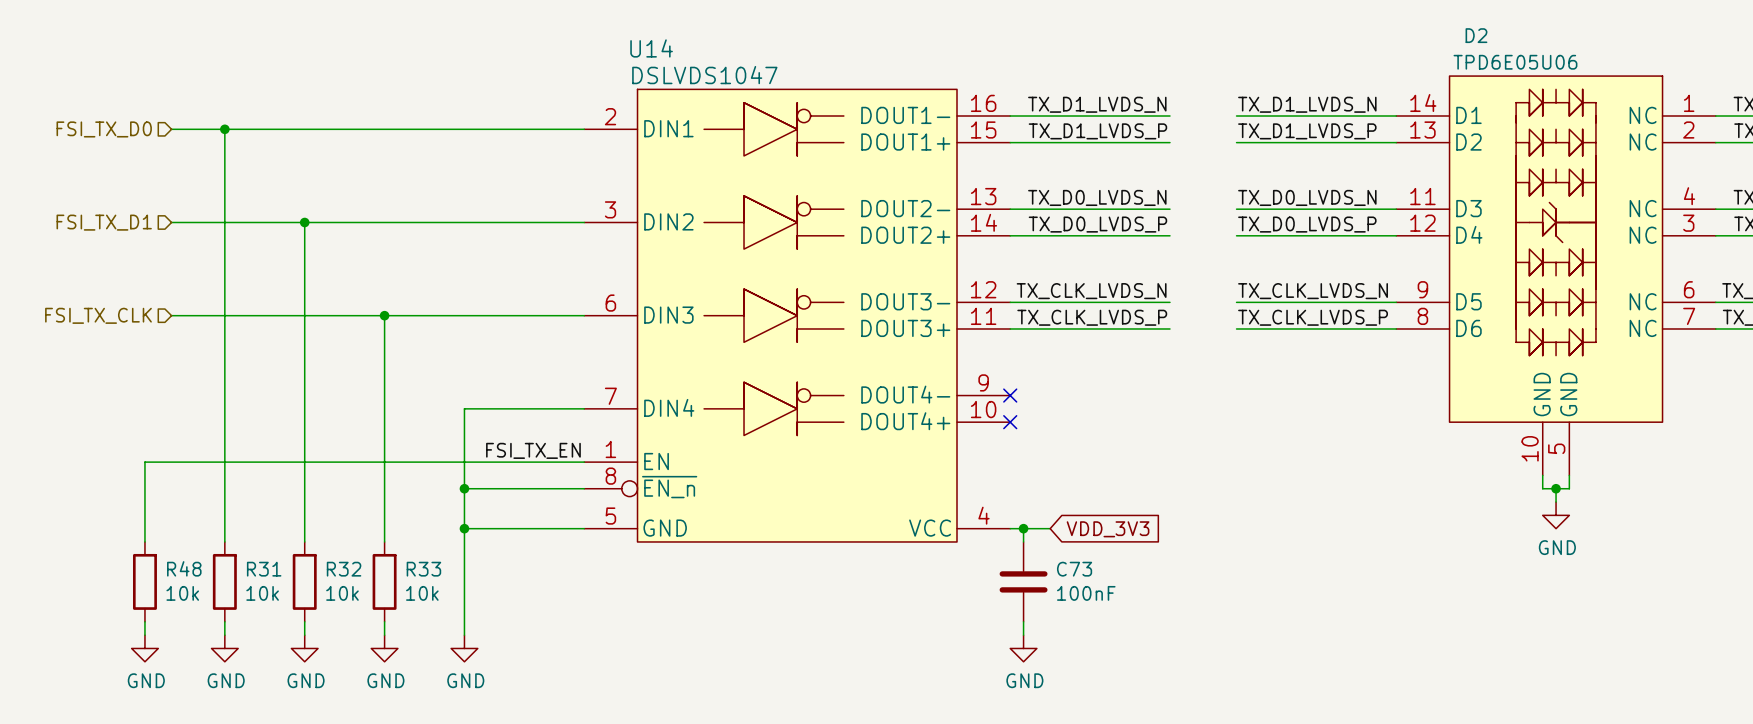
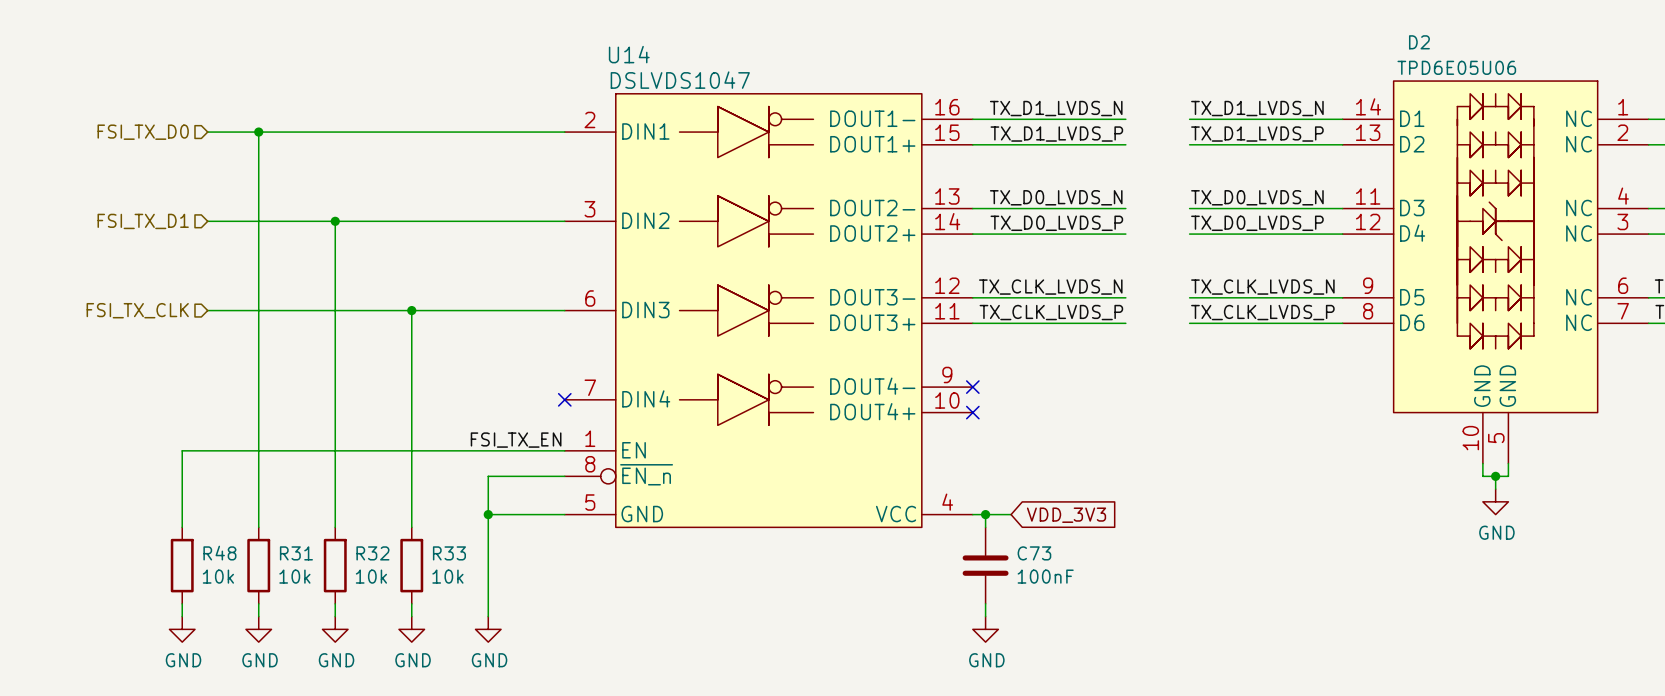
hierarchical label position: FSI_TX_D0 (104, 129) -> FSI_TX_D0 (143, 132)
wire: (171, 129) (211, 129) -> none
wire: (224, 129) (224, 541) -> (258, 132) (258, 527)
junction position: (224, 129) -> (258, 132)
hierarchical label position: FSI_TX_D1 (104, 222) -> FSI_TX_D1 (143, 221)
wire: (171, 222) (211, 222) -> none
wire: (304, 222) (304, 541) -> (335, 221) (335, 527)
junction position: (304, 222) -> (335, 221)
hierarchical label position: FSI_TX_CLK (98, 315) -> FSI_TX_CLK (137, 310)
wire: (171, 315) (211, 315) -> none
wire: (384, 315) (384, 541) -> (411, 310) (411, 527)
junction position: (384, 315) -> (411, 310)
wire: (584, 408) (464, 408) (464, 635) -> none
no-connect mark: none -> (564, 399)
wire: (184, 462) (144, 462) (144, 541) -> (182, 450) (182, 527)
wire: (464, 488) (504, 488) -> (488, 616) (488, 476)
junction: (464, 488) -> none
wire: (464, 528) (504, 528) -> none
junction: (464, 528) -> none
junction: none -> (488, 514)
R48 position: (144, 581) -> (182, 565)
R31 position: (224, 581) -> (258, 565)
R32 position: (304, 581) -> (335, 565)
R33 position: (384, 581) -> (411, 565)
wire: (144, 621) (144, 635) -> (182, 603) (182, 616)
wire: (224, 621) (224, 635) -> (258, 603) (258, 616)
wire: (304, 621) (304, 635) -> (335, 603) (335, 616)
wire: (384, 621) (384, 635) -> (411, 603) (411, 616)
power symbol: GND (144, 648) -> none
power symbol: none -> GND (182, 629)
power symbol: GND (224, 648) -> none
power symbol: none -> GND (258, 629)
power symbol: GND (304, 648) -> none
power symbol: none -> GND (335, 629)
power symbol: GND (384, 648) -> none
power symbol: none -> GND (411, 629)
power symbol: GND (464, 648) -> none
power symbol: none -> GND (488, 629)

